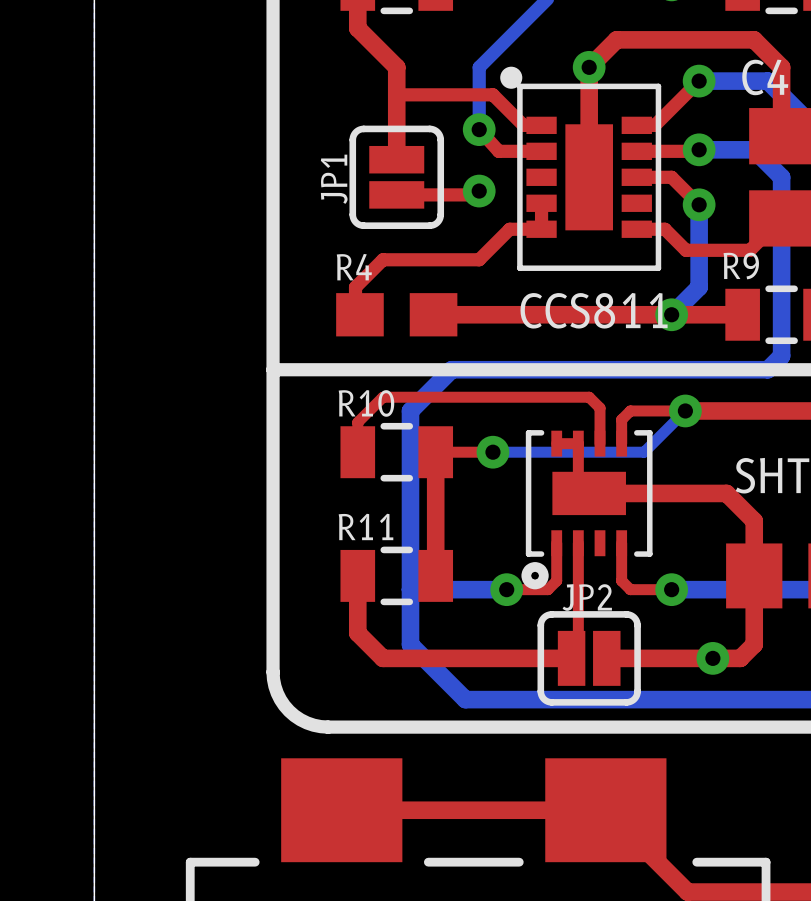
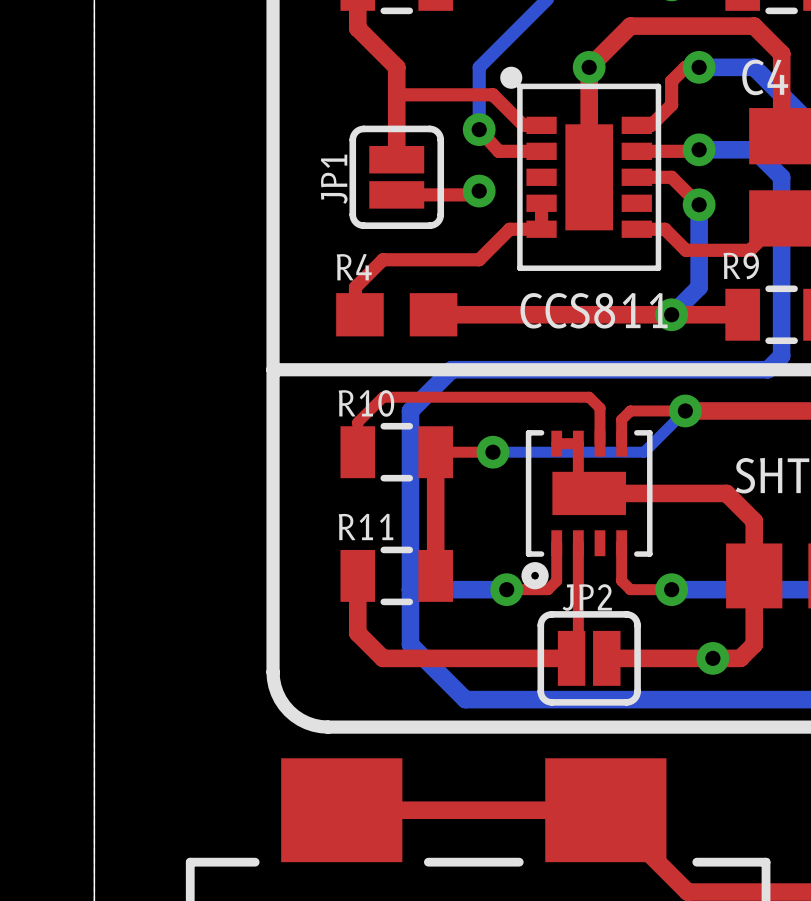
top track: (616, 39) (754, 39) (781, 67) -> (616, 39) (630, 26) (754, 26) (781, 53) (781, 67)
top track: (699, 81) (654, 125) (651, 125) -> (699, 67) (685, 67) (671, 81) (671, 104) (651, 125)
bottom track: (699, 81) (767, 81) -> (699, 67) (754, 67) (767, 81)
via position: (699, 81) -> (699, 67)

